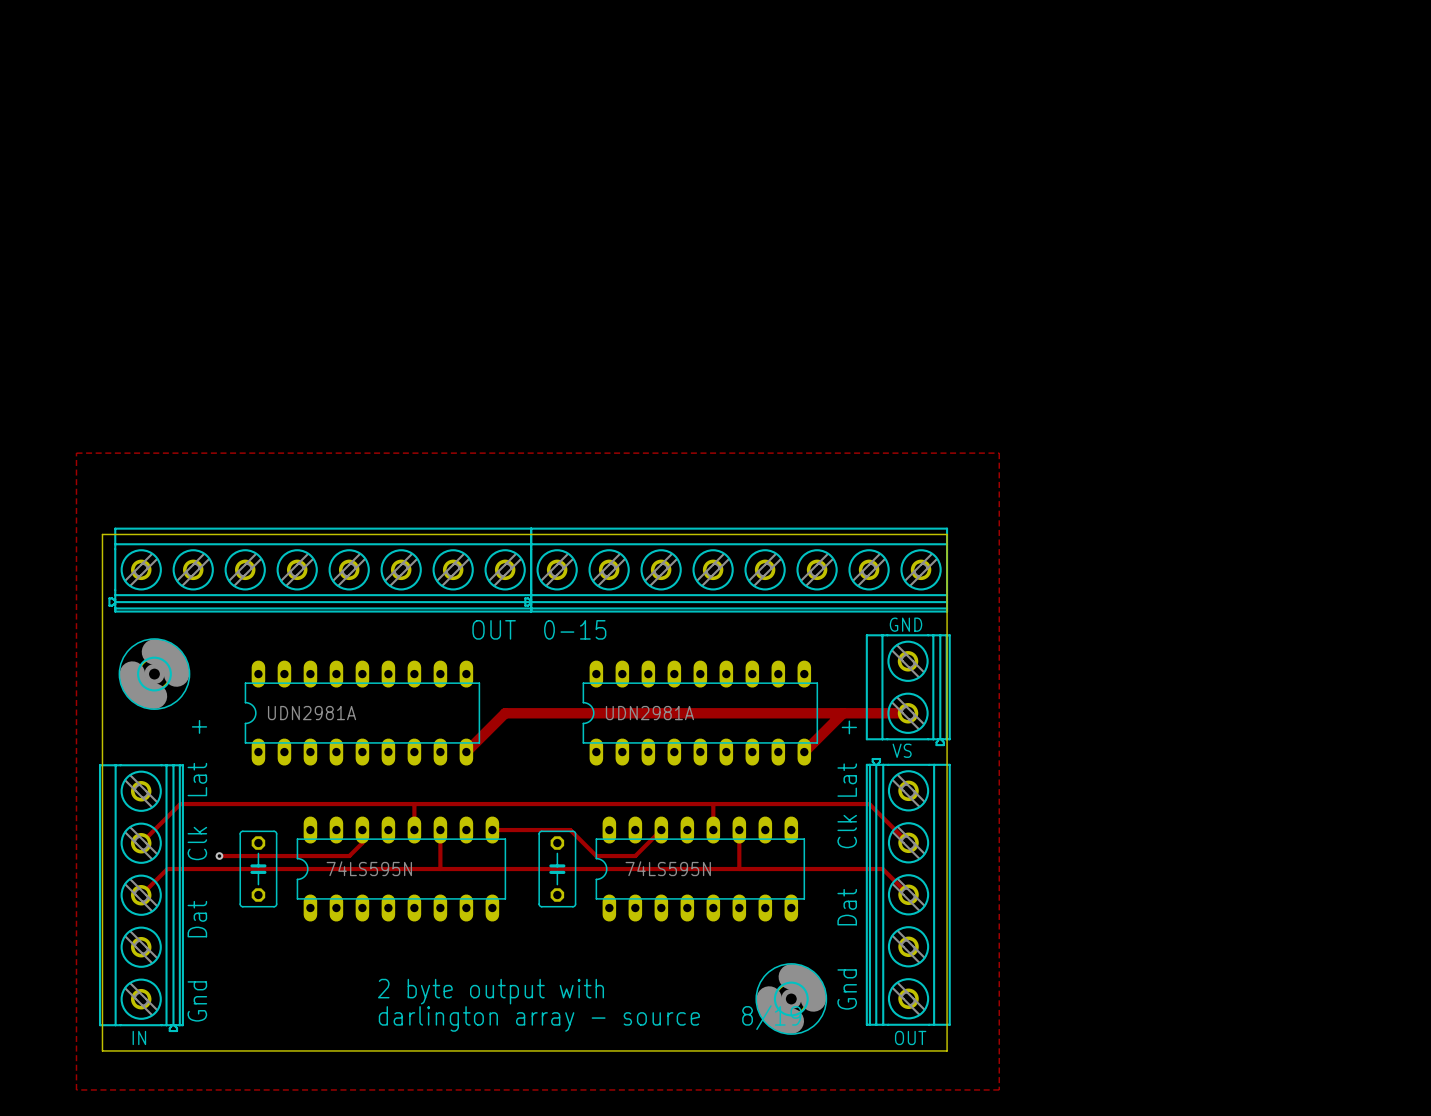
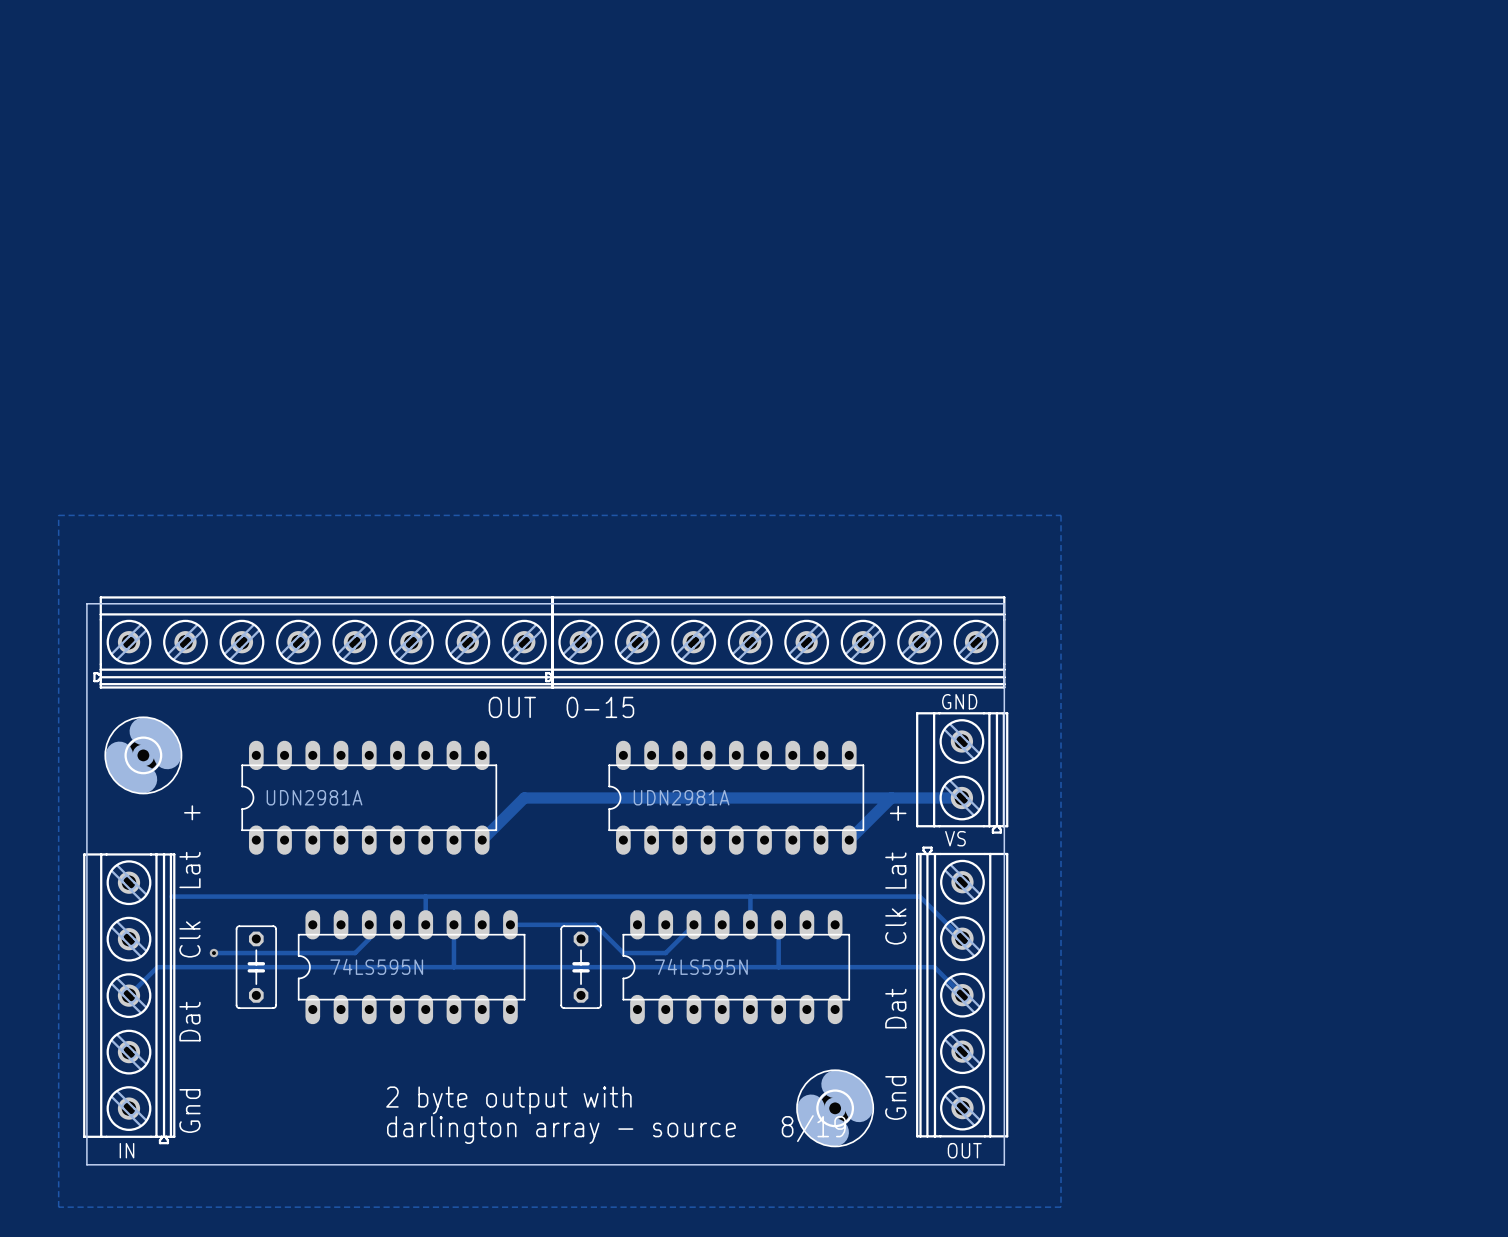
track: (180, 804) (141, 843) -> none

